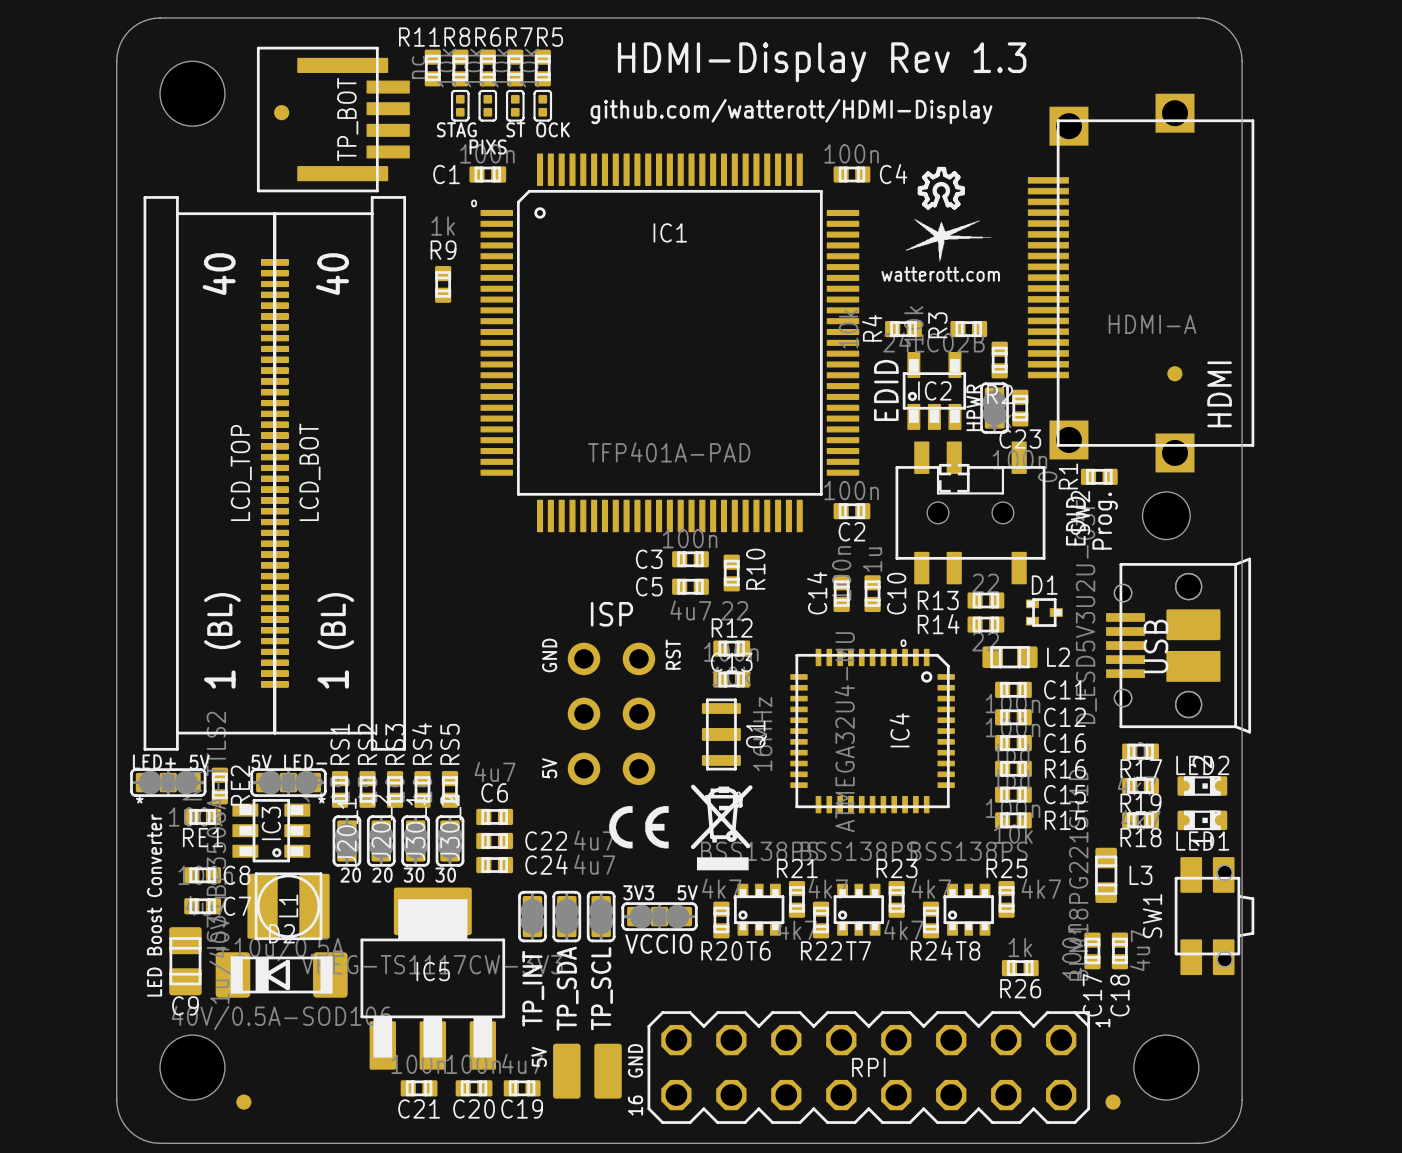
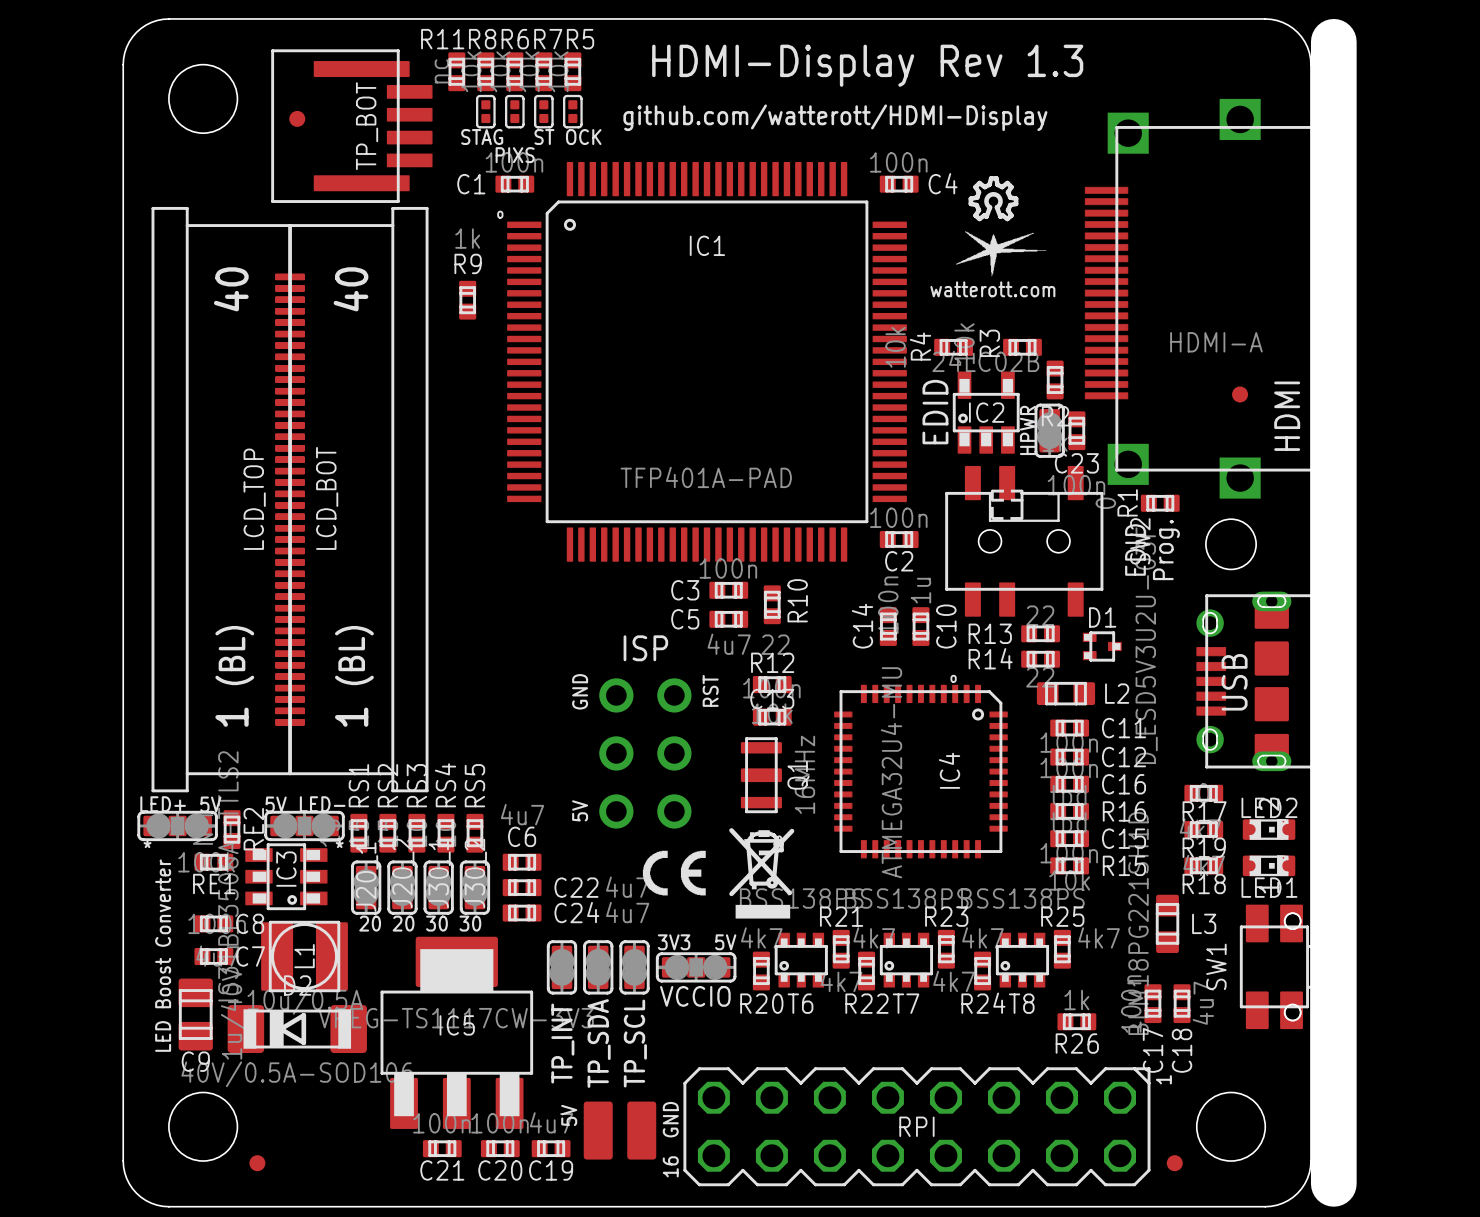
board edge: none -> (1333, 41) (1333, 1183)
USB footprint: [1106, 557, 1252, 734] -> [1196, 588, 1335, 775]

